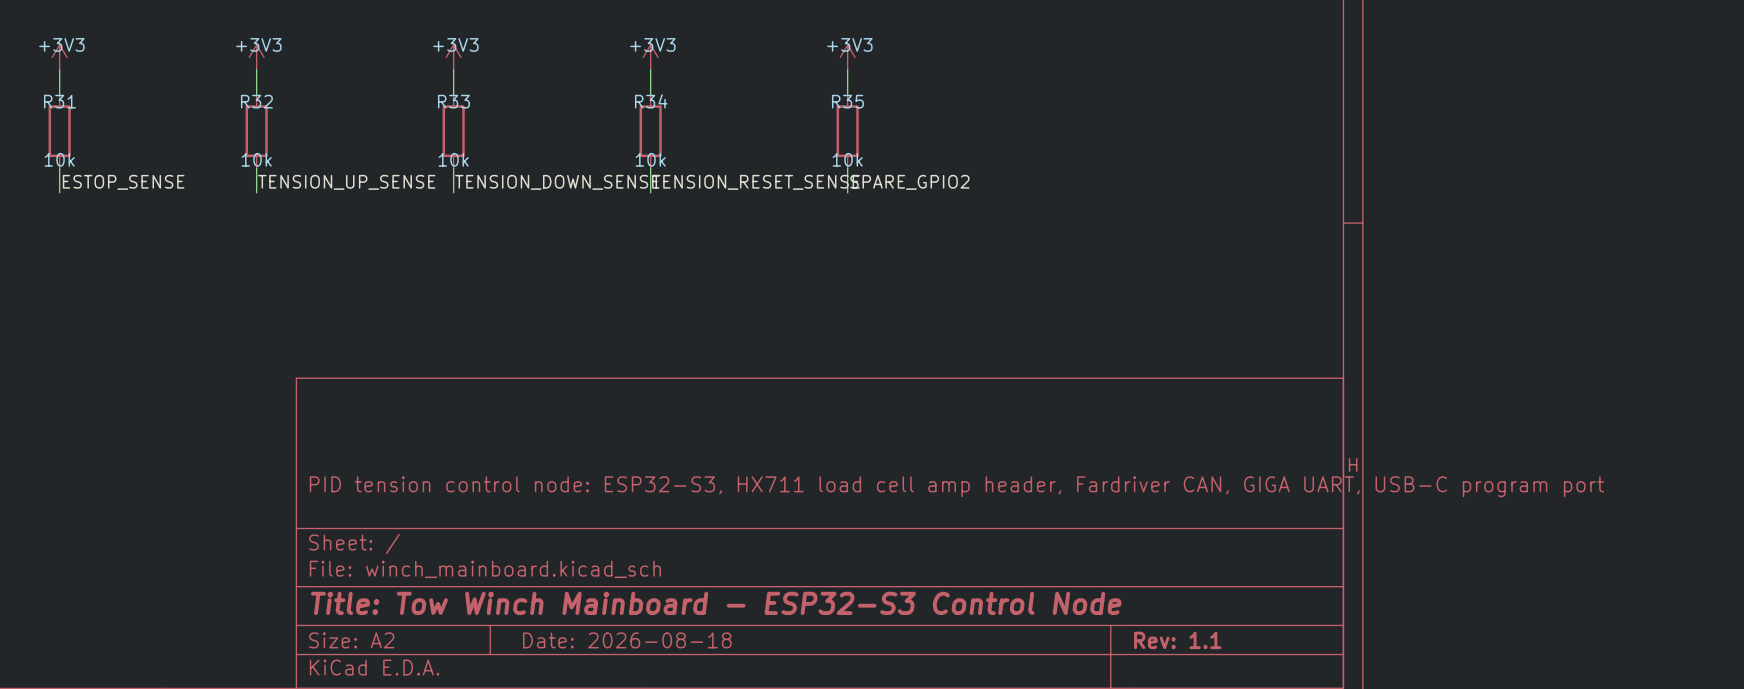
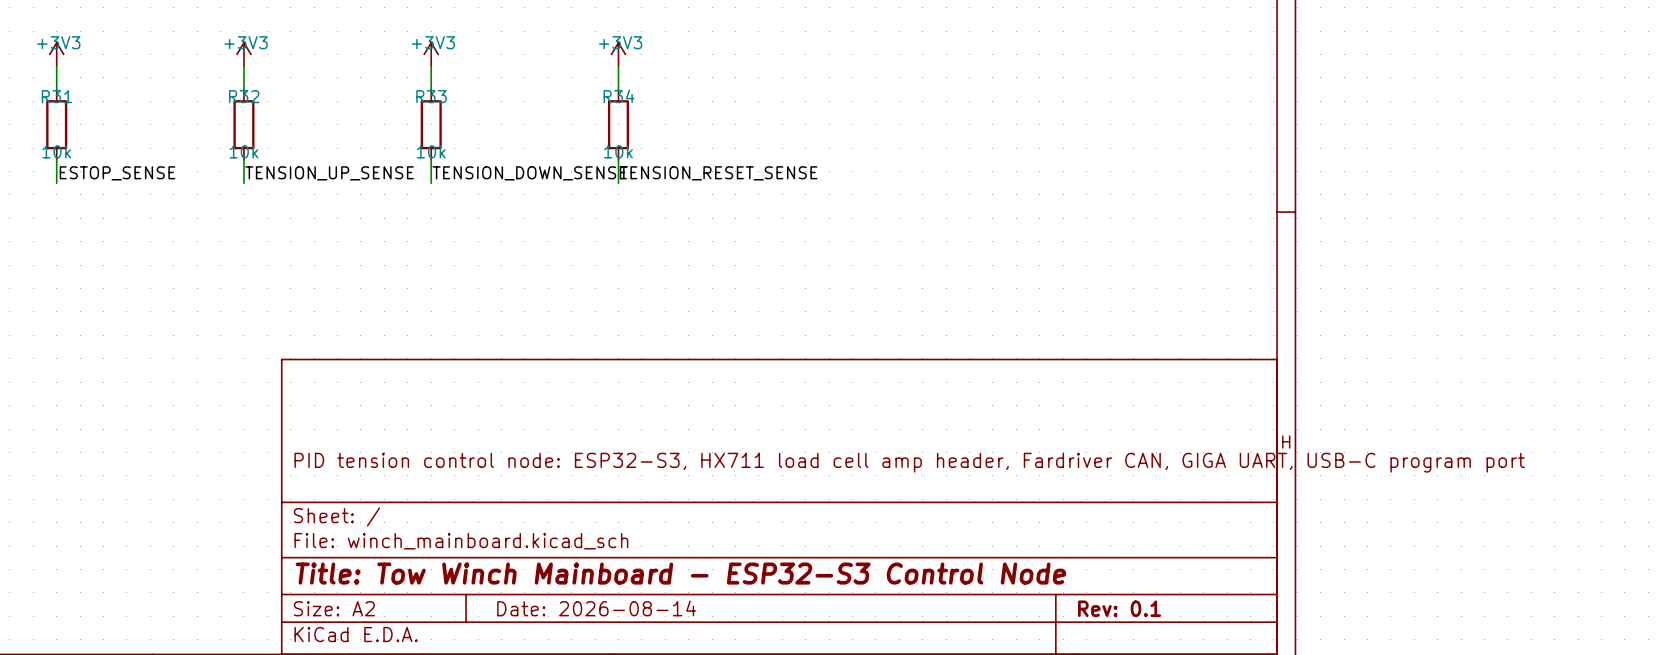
power symbol: +3V3 (847, 57) -> none
wire: (847, 69) (847, 94) -> none
R35: 10k (847, 131) -> none
wire: (847, 168) (847, 192) -> none
label: SPARE_GPIO2 (909, 182) -> none
title block: Date: 2026-08-18 (627, 640) -> Date: 2026-08-14 (596, 608)
title block: Rev: 1.1 (1177, 640) -> Rev: 0.1 (1119, 608)

